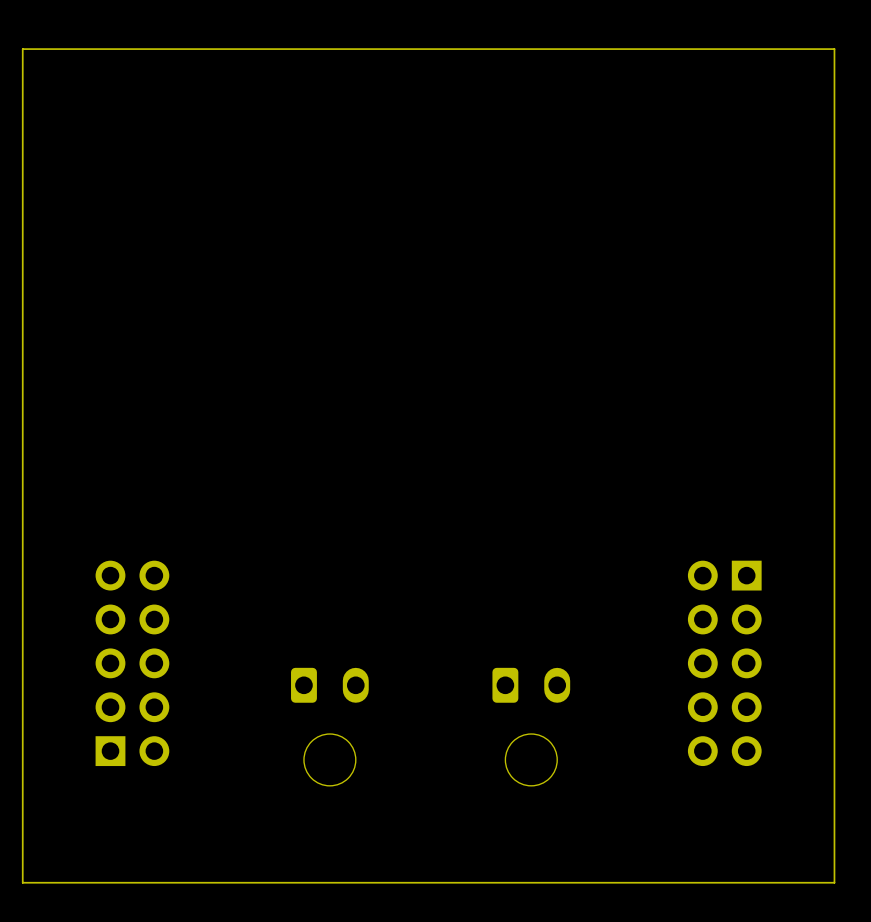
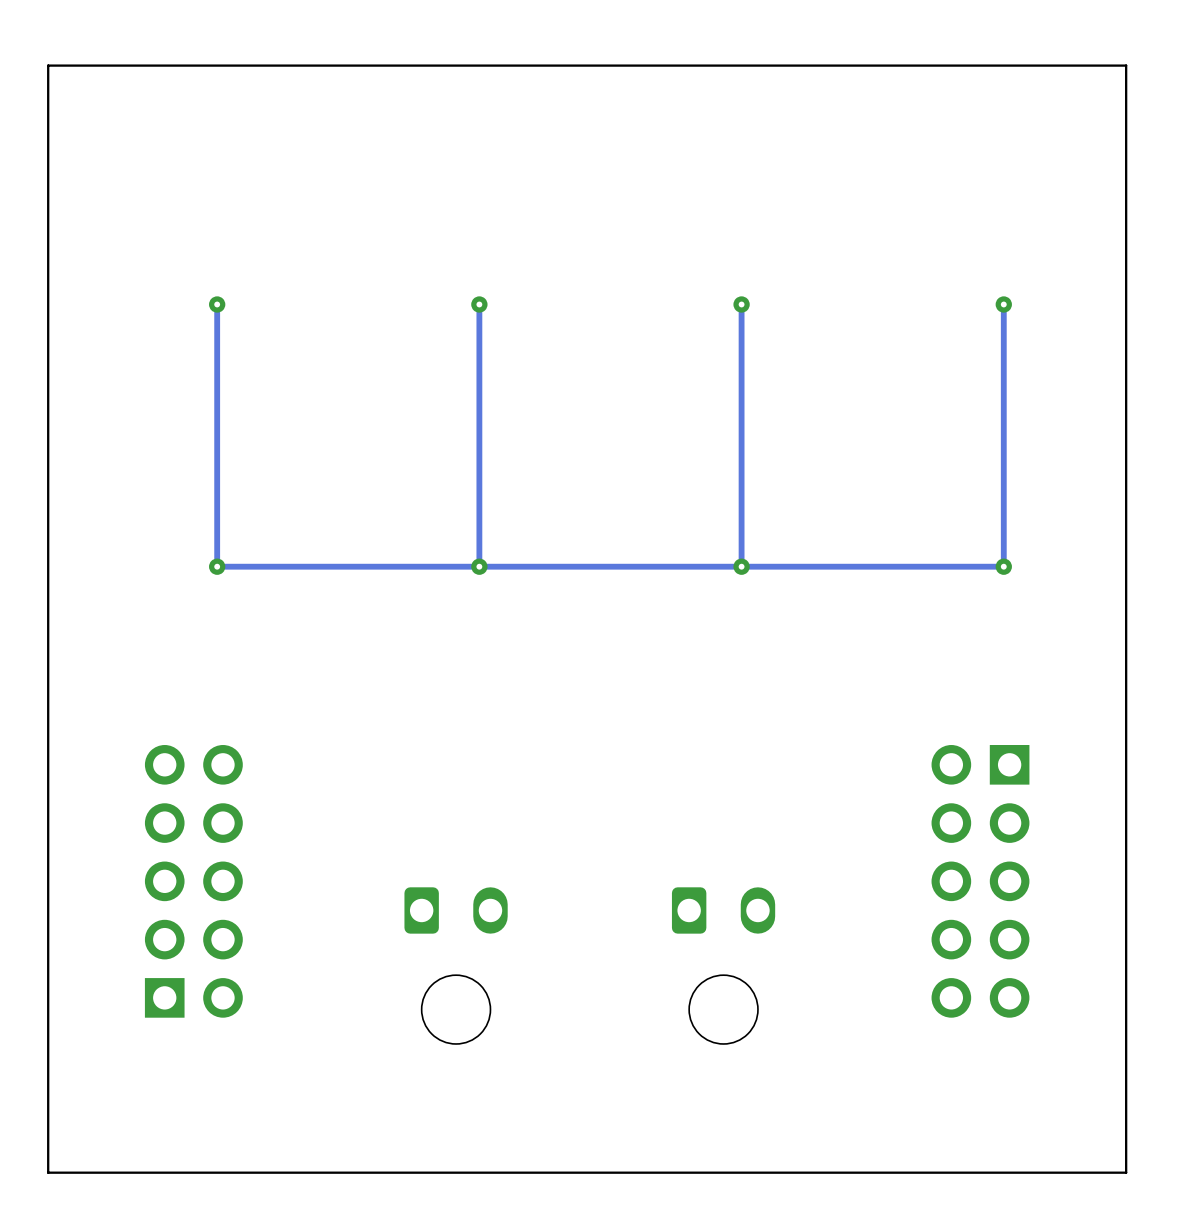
via: none -> (217, 304)
track: none -> (479, 304) (479, 566)
via: none -> (479, 304)
track: none -> (741, 304) (741, 566)
via: none -> (741, 304)
track: none -> (1003, 304) (1003, 566) (217, 566) (217, 304)
via: none -> (1003, 304)
via: none -> (217, 566)
via: none -> (479, 566)
via: none -> (741, 566)
via: none -> (1003, 566)

